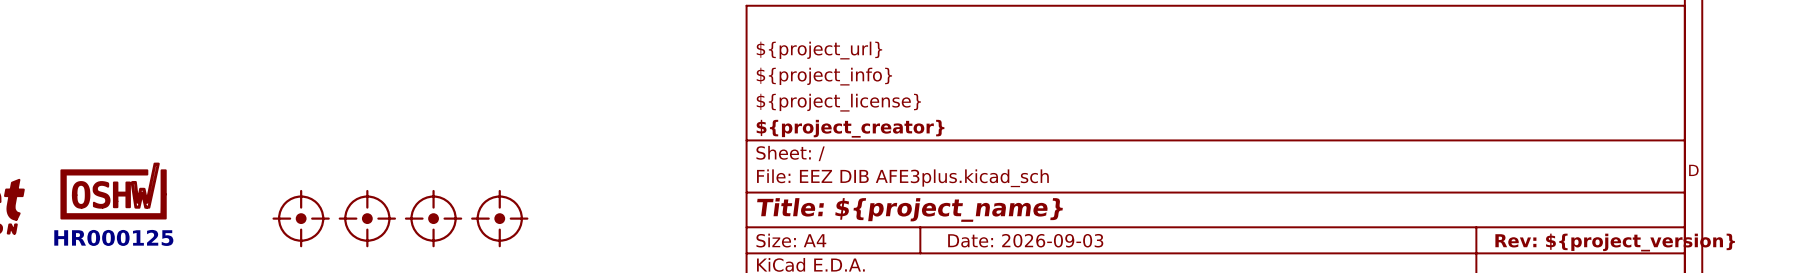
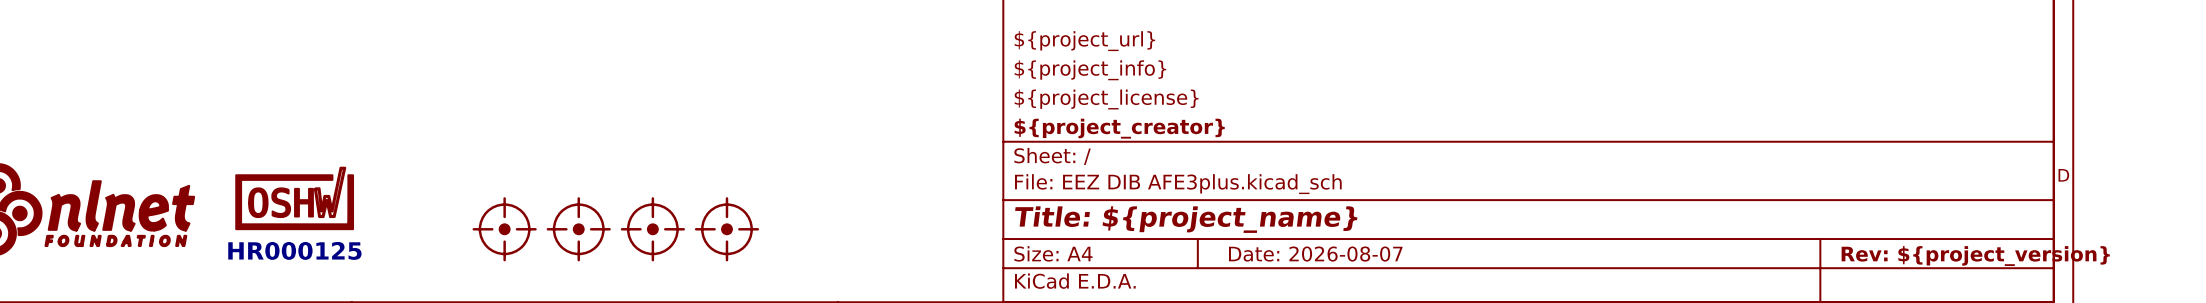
title block: Date: 2026-09-03 (1025, 240) -> Date: 2026-08-07 (1315, 254)

